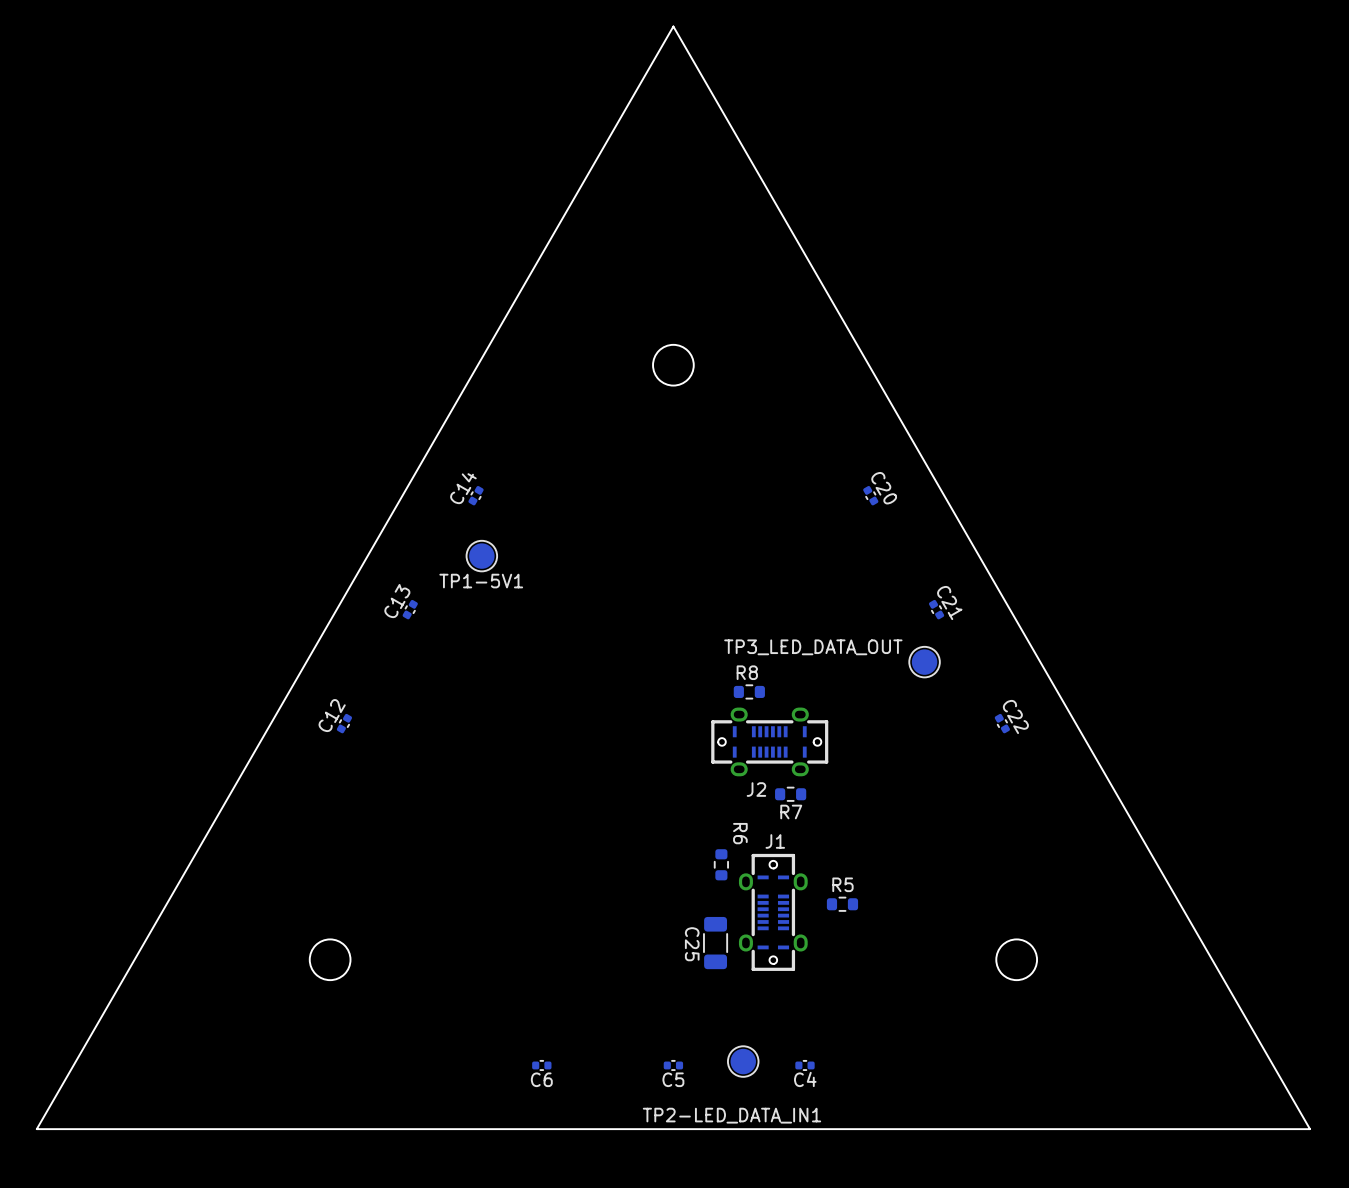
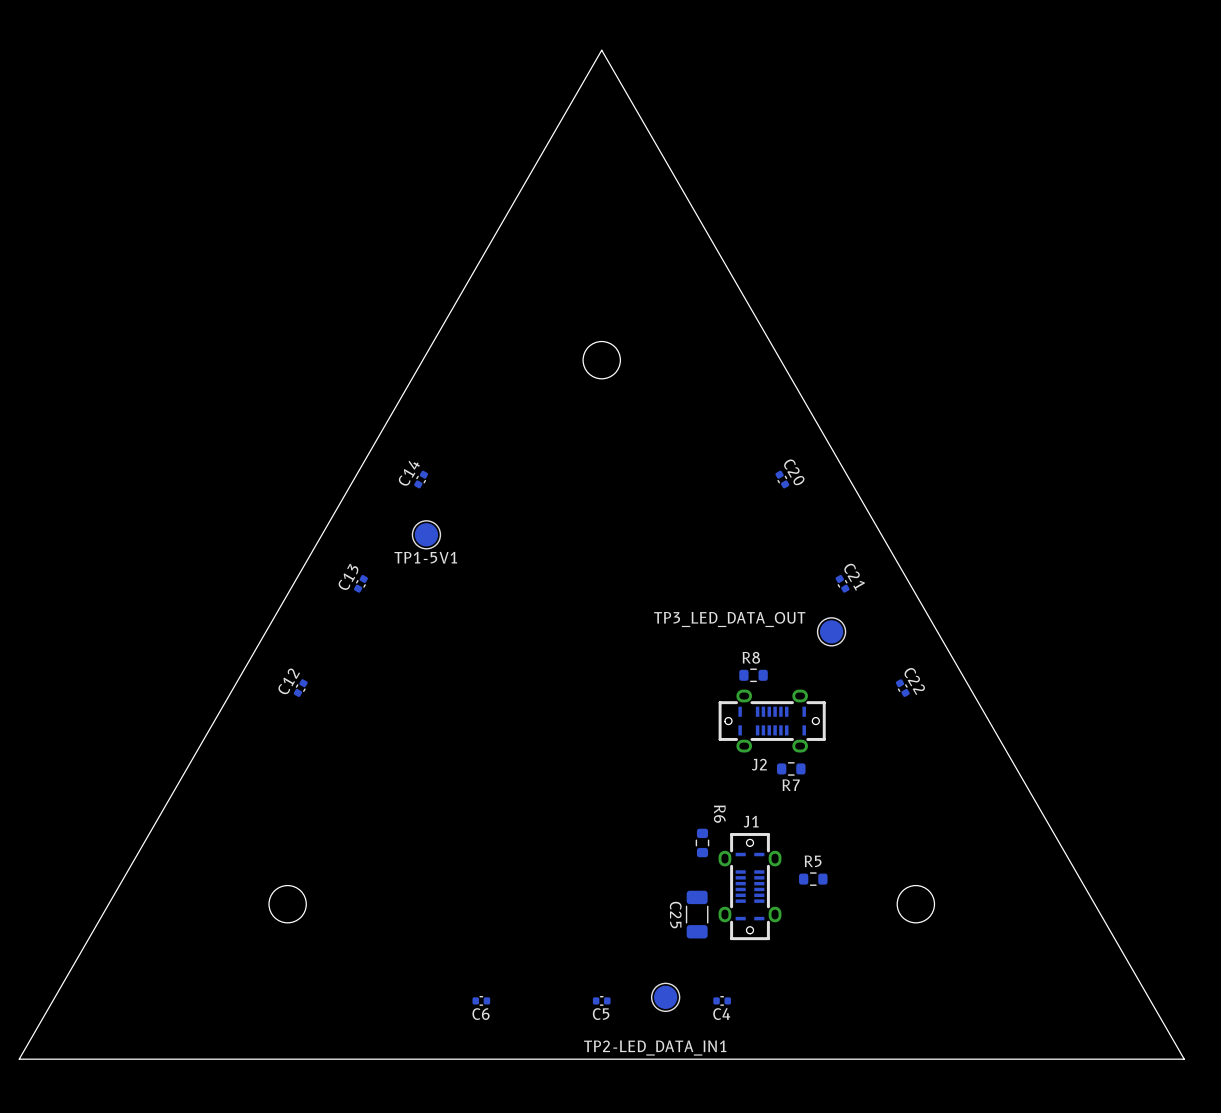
R8 position: (749, 691) -> (753, 675)
J2 position: (769, 741) -> (772, 721)
R7 position: (790, 794) -> (791, 768)
R6 position: (721, 864) -> (702, 842)
R5 position: (842, 904) -> (813, 879)
J1 position: (773, 912) -> (750, 886)
C25 position: (715, 943) -> (697, 914)

